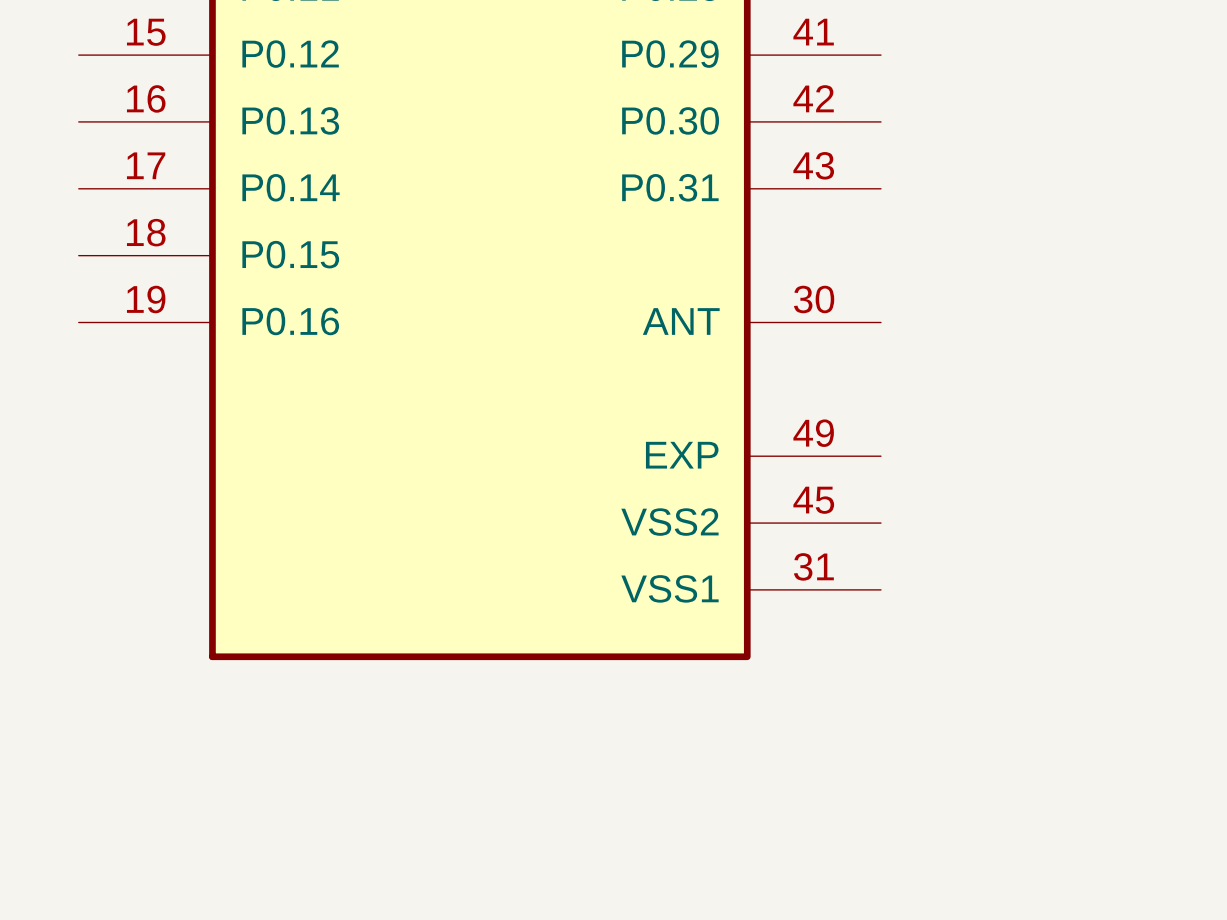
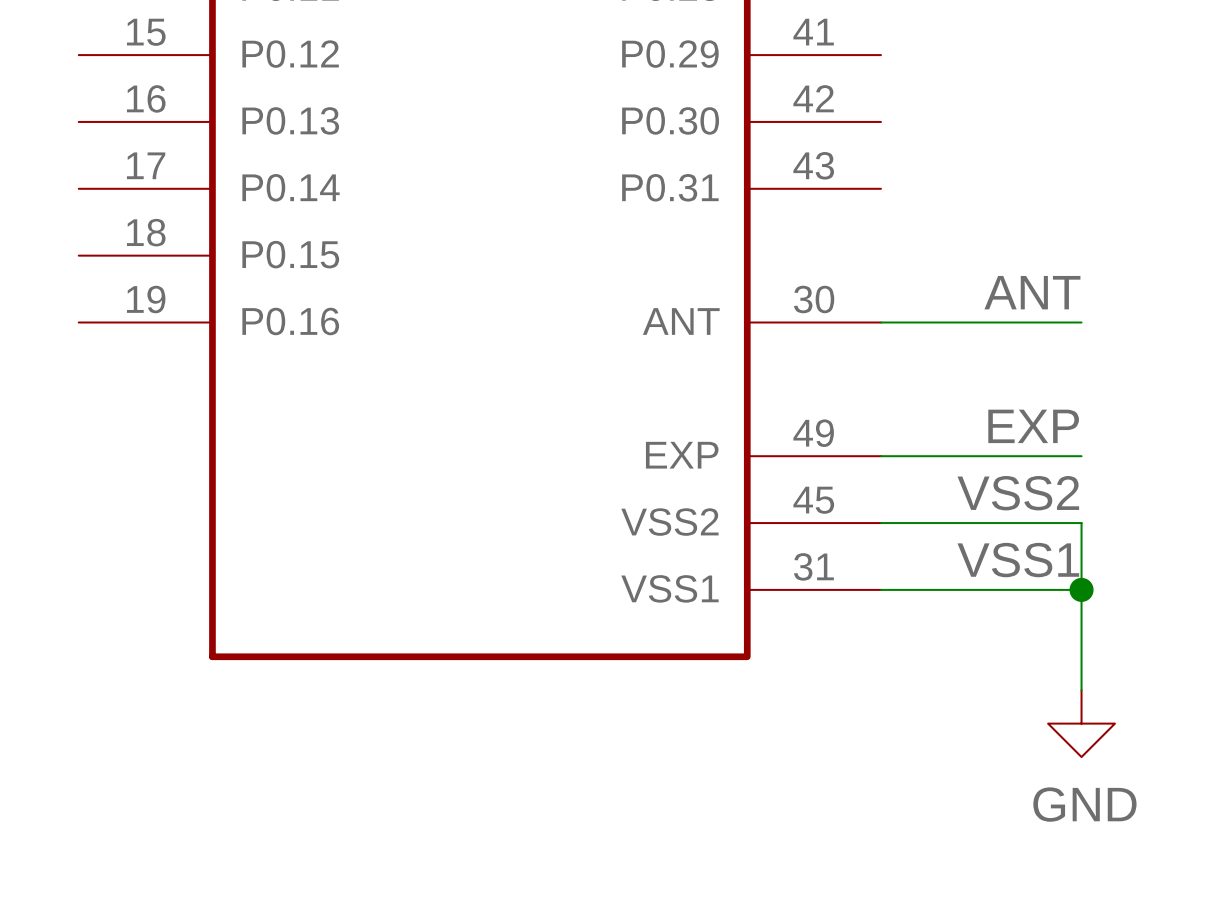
label: none -> ANT (1032, 292)
wire: none -> (880, 322) (1081, 322)
label: none -> EXP (1033, 426)
wire: none -> (880, 456) (1081, 456)
label: none -> VSS2 (1018, 493)
wire: none -> (880, 523) (1081, 523) (1081, 690)
label: none -> VSS1 (1018, 560)
wire: none -> (880, 589) (1081, 589)
junction: none -> (1081, 589)
power symbol: none -> GND (1081, 723)

